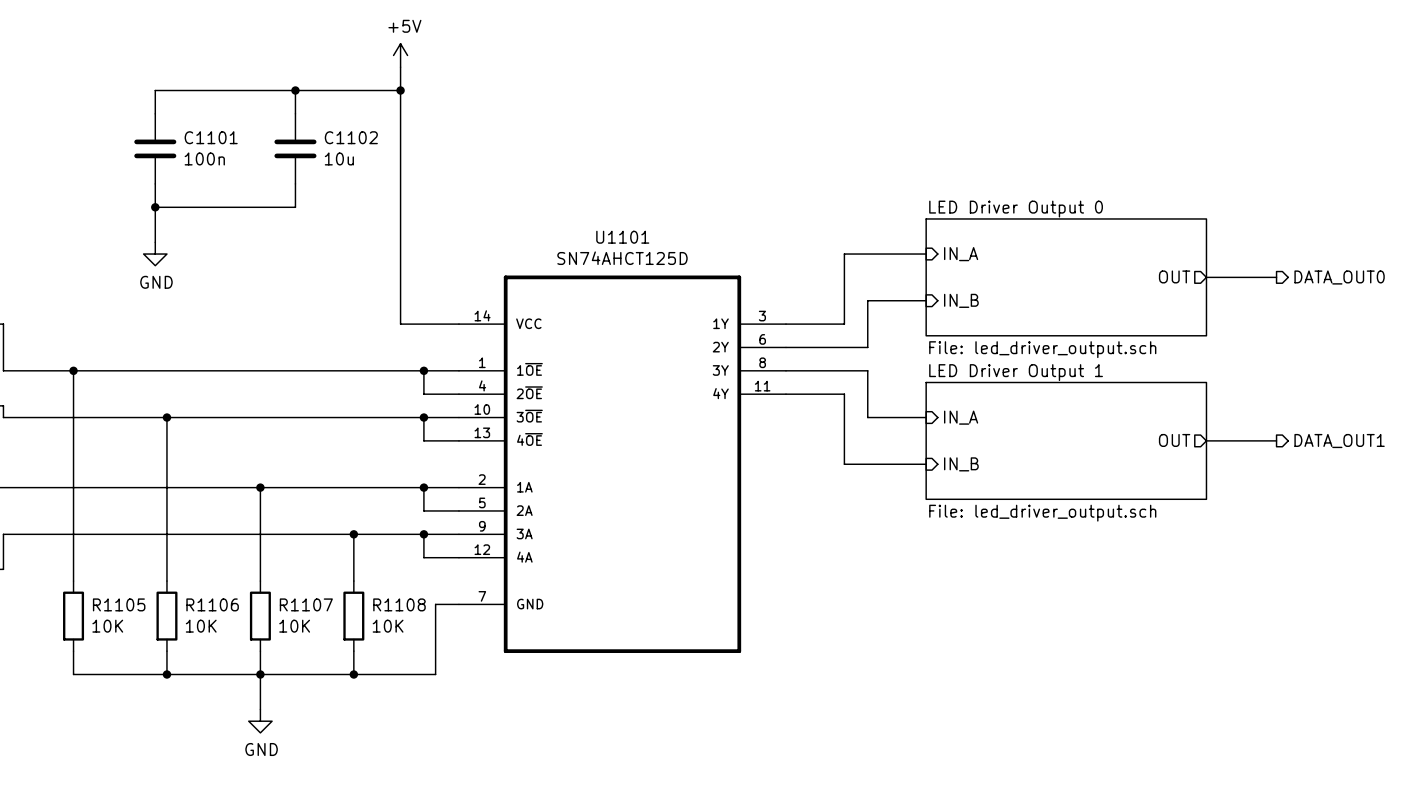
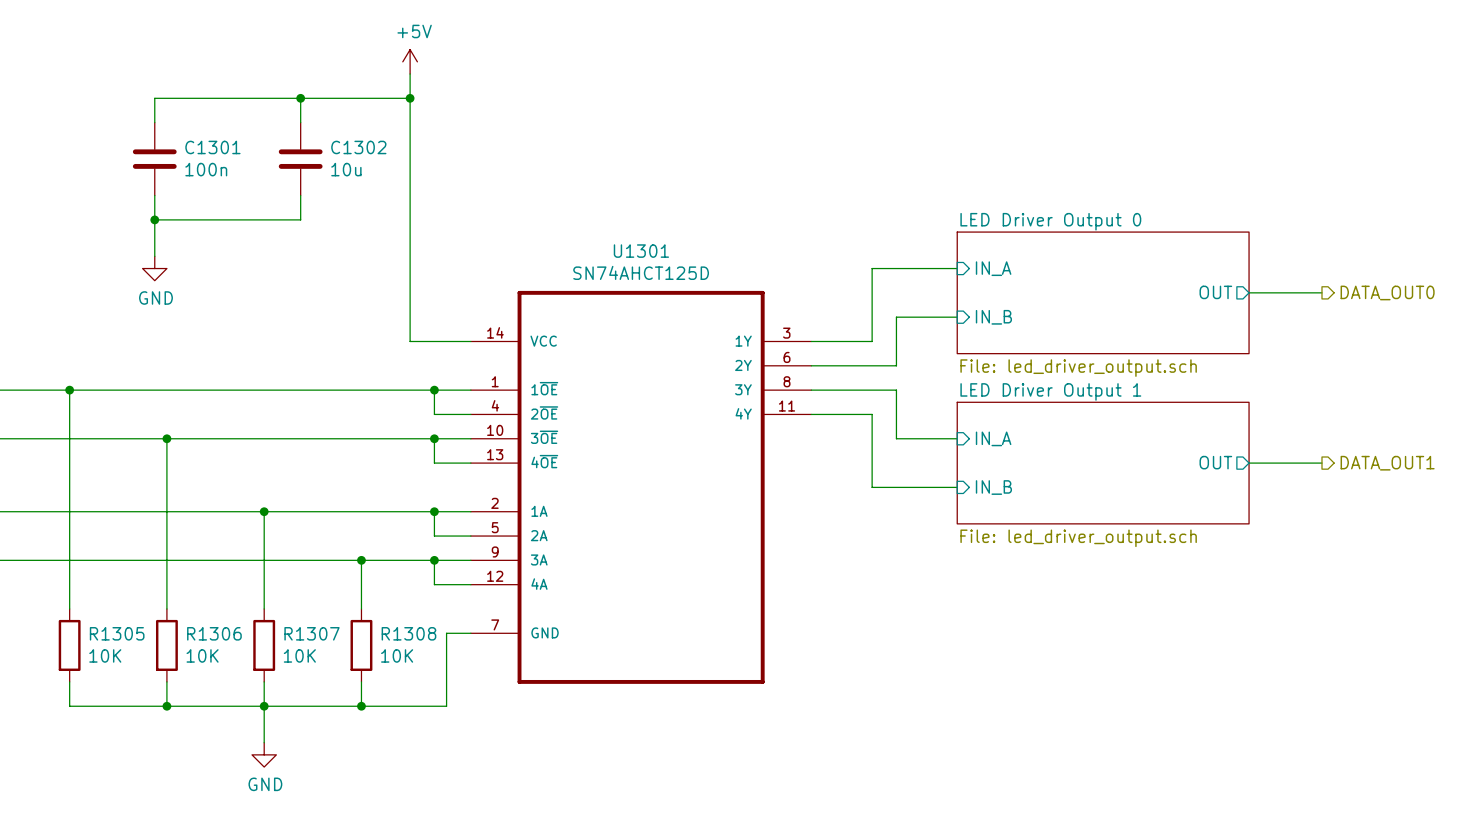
C1101 name: C1101 (211, 137) -> C1301 (212, 147)
C1102 name: C1102 (351, 137) -> C1302 (358, 147)
U1101 name: U1101 (622, 237) -> U1301 (641, 251)
R1105 name: R1105 (119, 604) -> R1305 (117, 633)
R1106 name: R1106 (212, 604) -> R1306 (214, 633)
R1107 name: R1107 (306, 604) -> R1307 (311, 633)
R1108 name: R1108 (399, 604) -> R1308 (408, 633)

